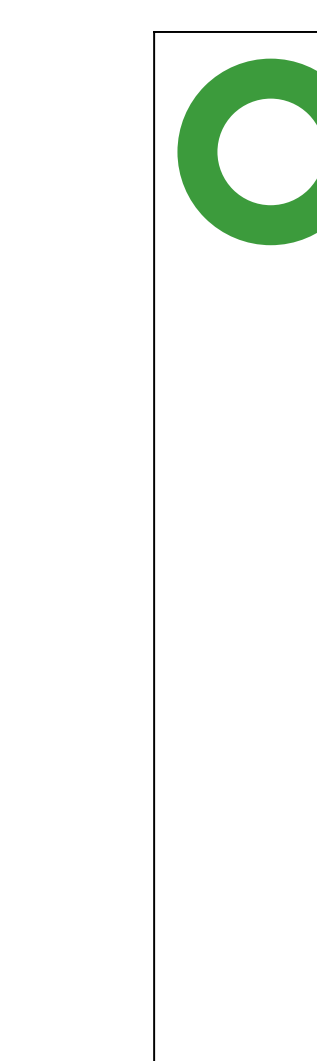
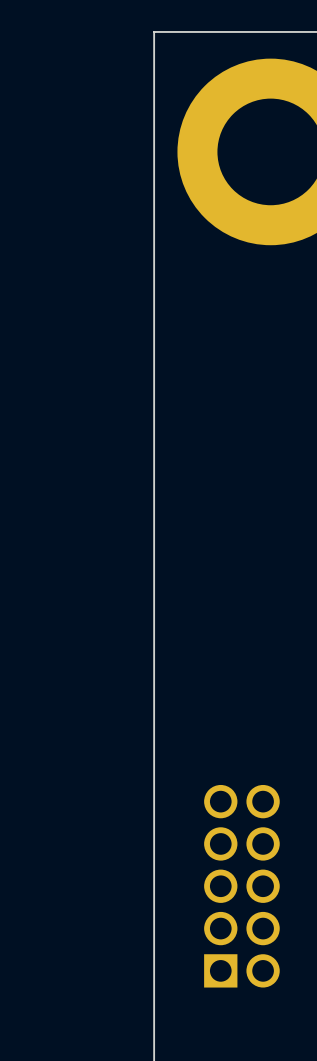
part: none -> (241, 886)

